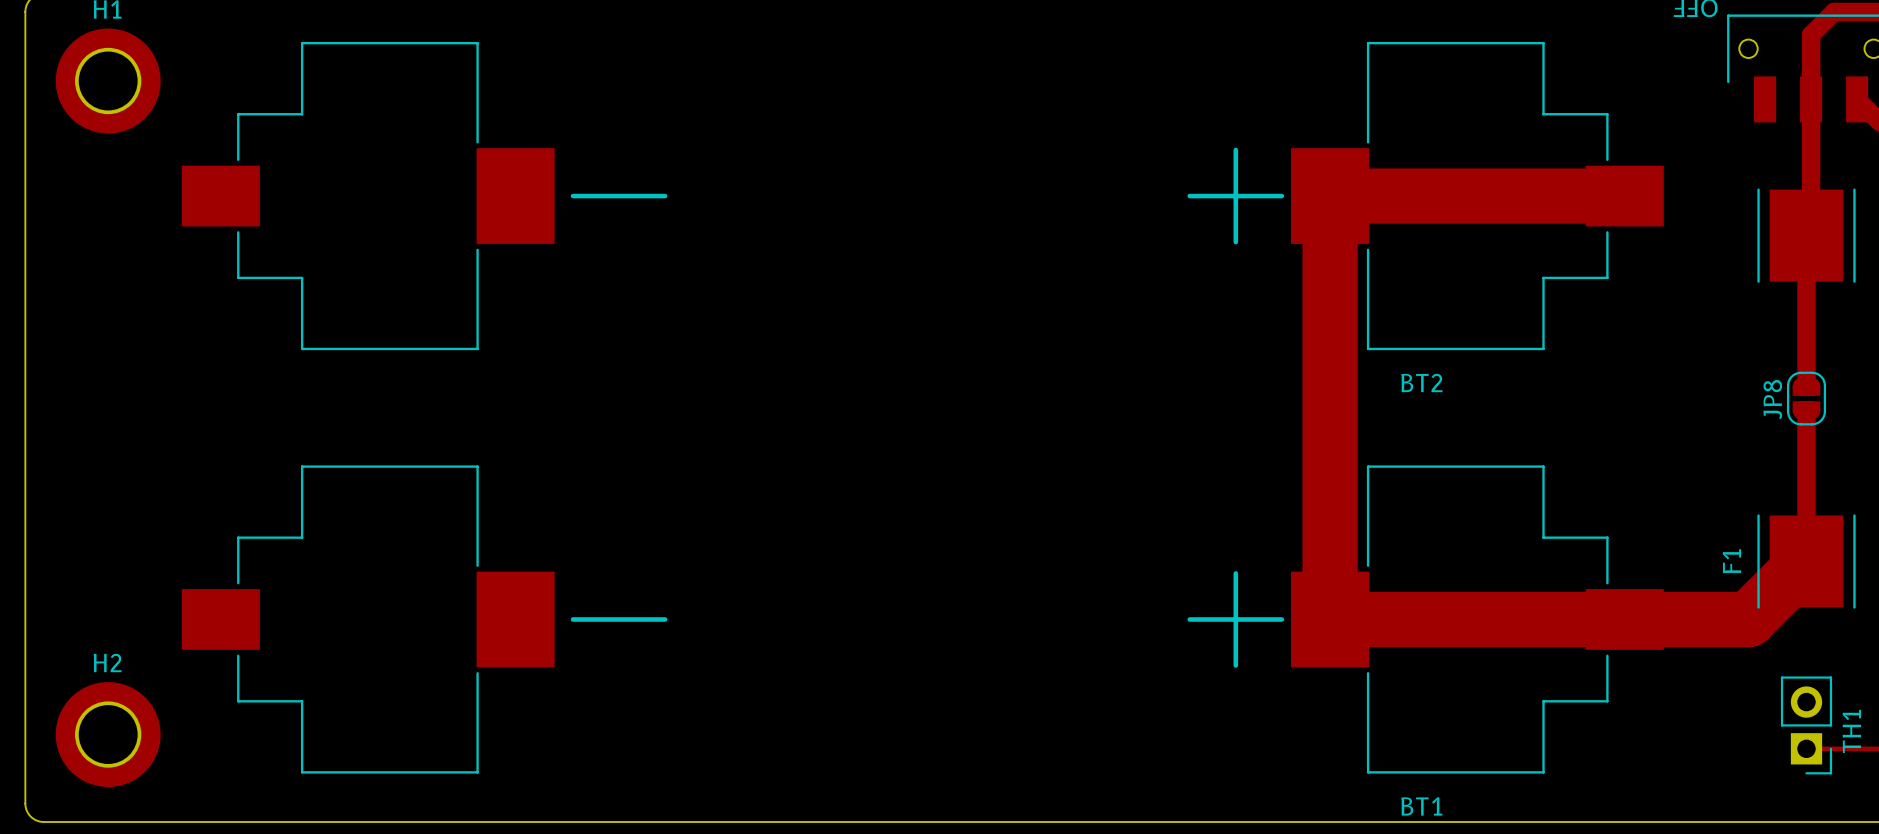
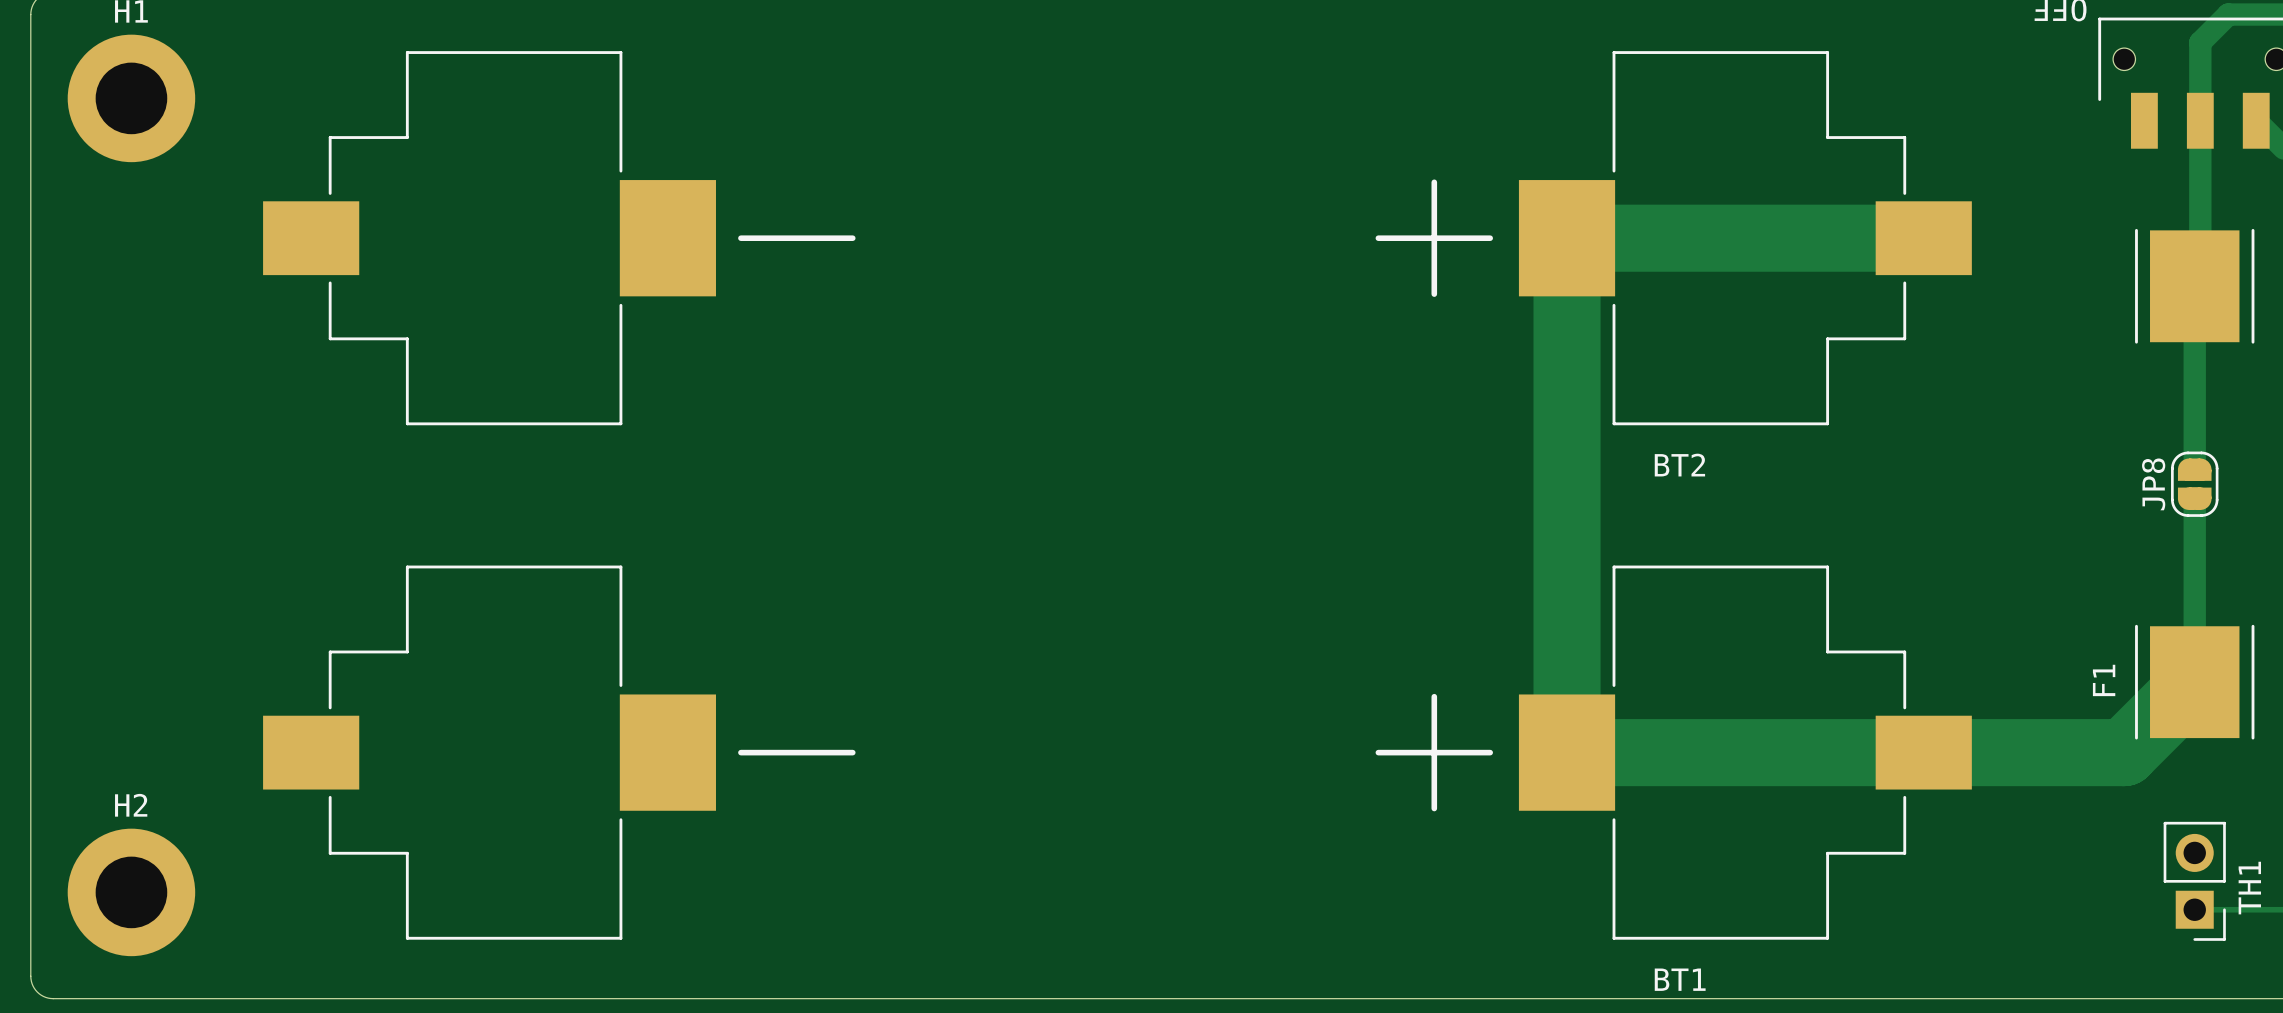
BT2 footprint: [181, 42, 1664, 351] -> [263, 51, 1972, 426]
line: (1235, 150) (1235, 242) -> (1434, 182) (1434, 294)
line: (573, 196) (609, 196) -> (808, 238) (852, 238)
line: (1226, 196) (1281, 196) -> (1378, 238) (1445, 238)
track: (1330, 196) (1330, 619) -> (1615, 238) (1567, 238) (1567, 752) (1615, 752)
BT1 footprint: [181, 465, 1664, 774] -> [263, 565, 1972, 940]
line: (1235, 573) (1235, 665) -> (1434, 696) (1434, 808)
line: (573, 619) (609, 619) -> (808, 752) (852, 752)
line: (1226, 619) (1281, 619) -> (1378, 752) (1445, 752)

